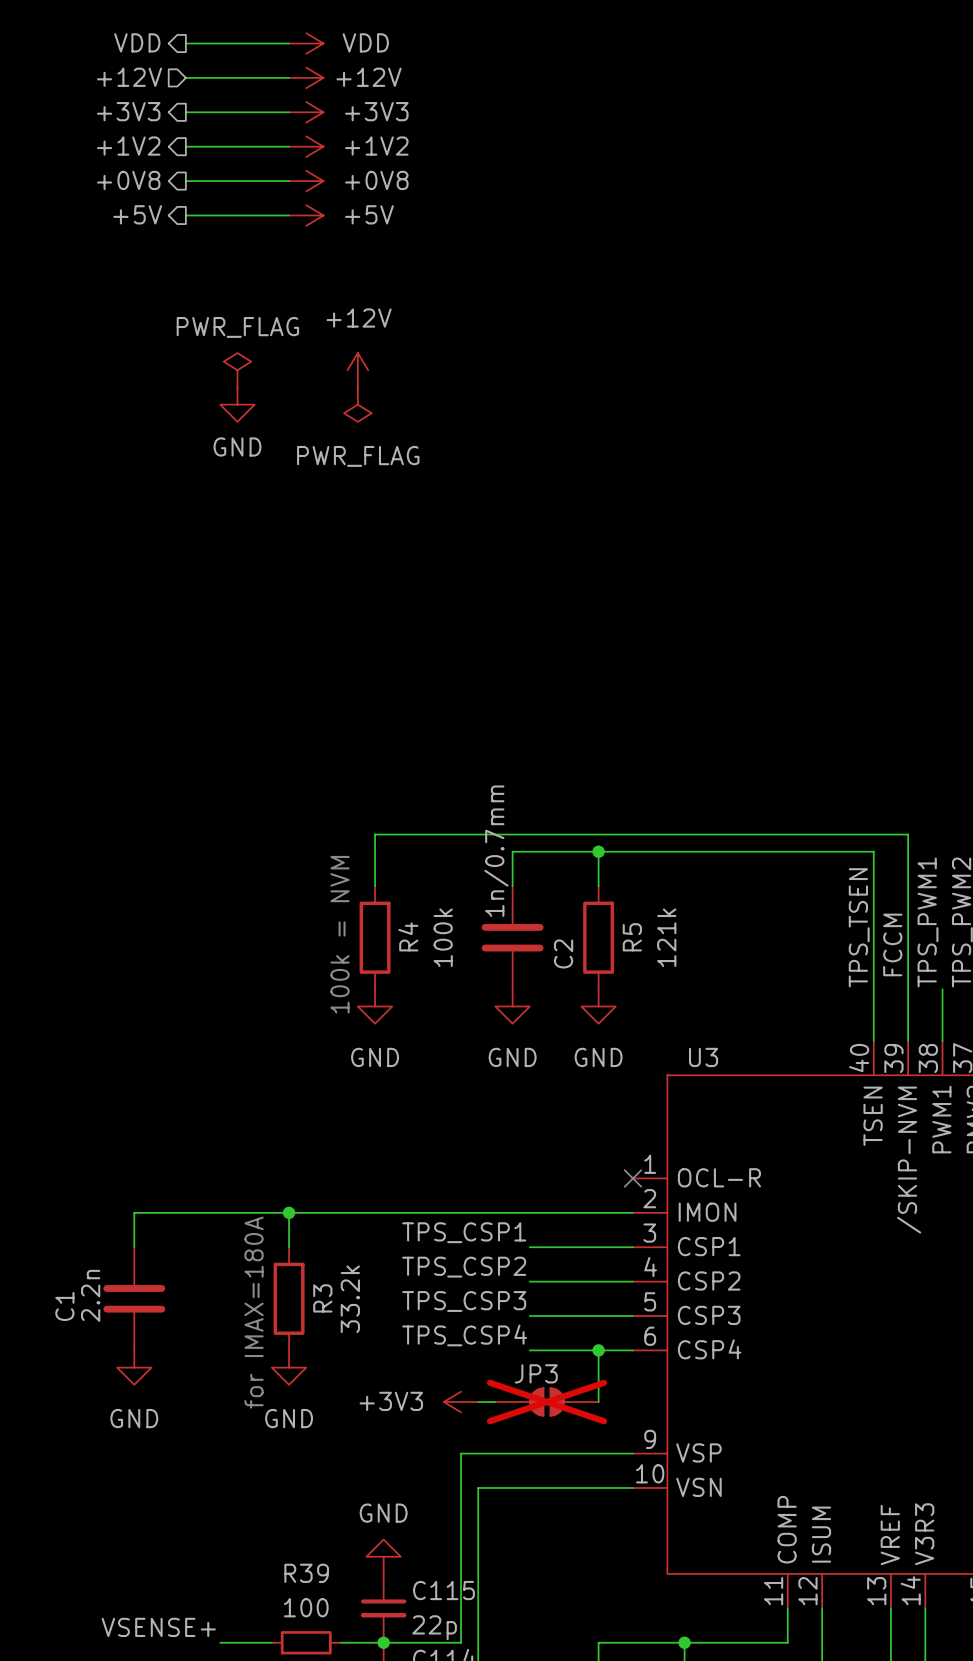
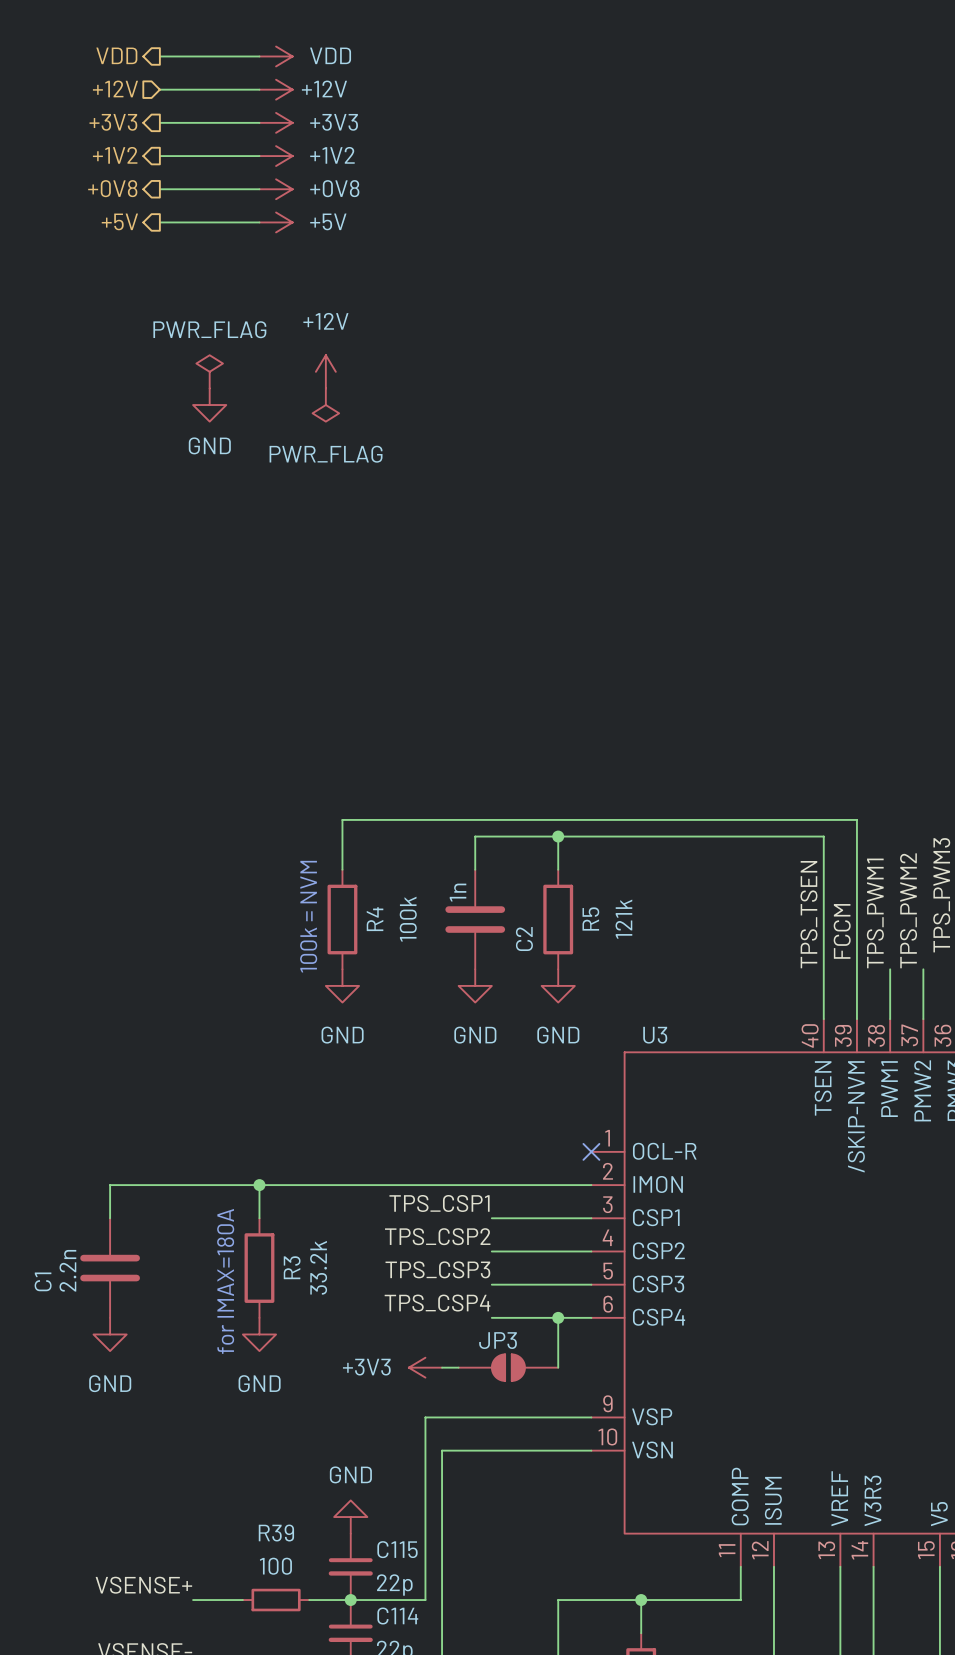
C2 value: 1n/0.7mm (496, 851) -> 1n (458, 892)
JP3 do-not-place cross: (547, 1402) -> none

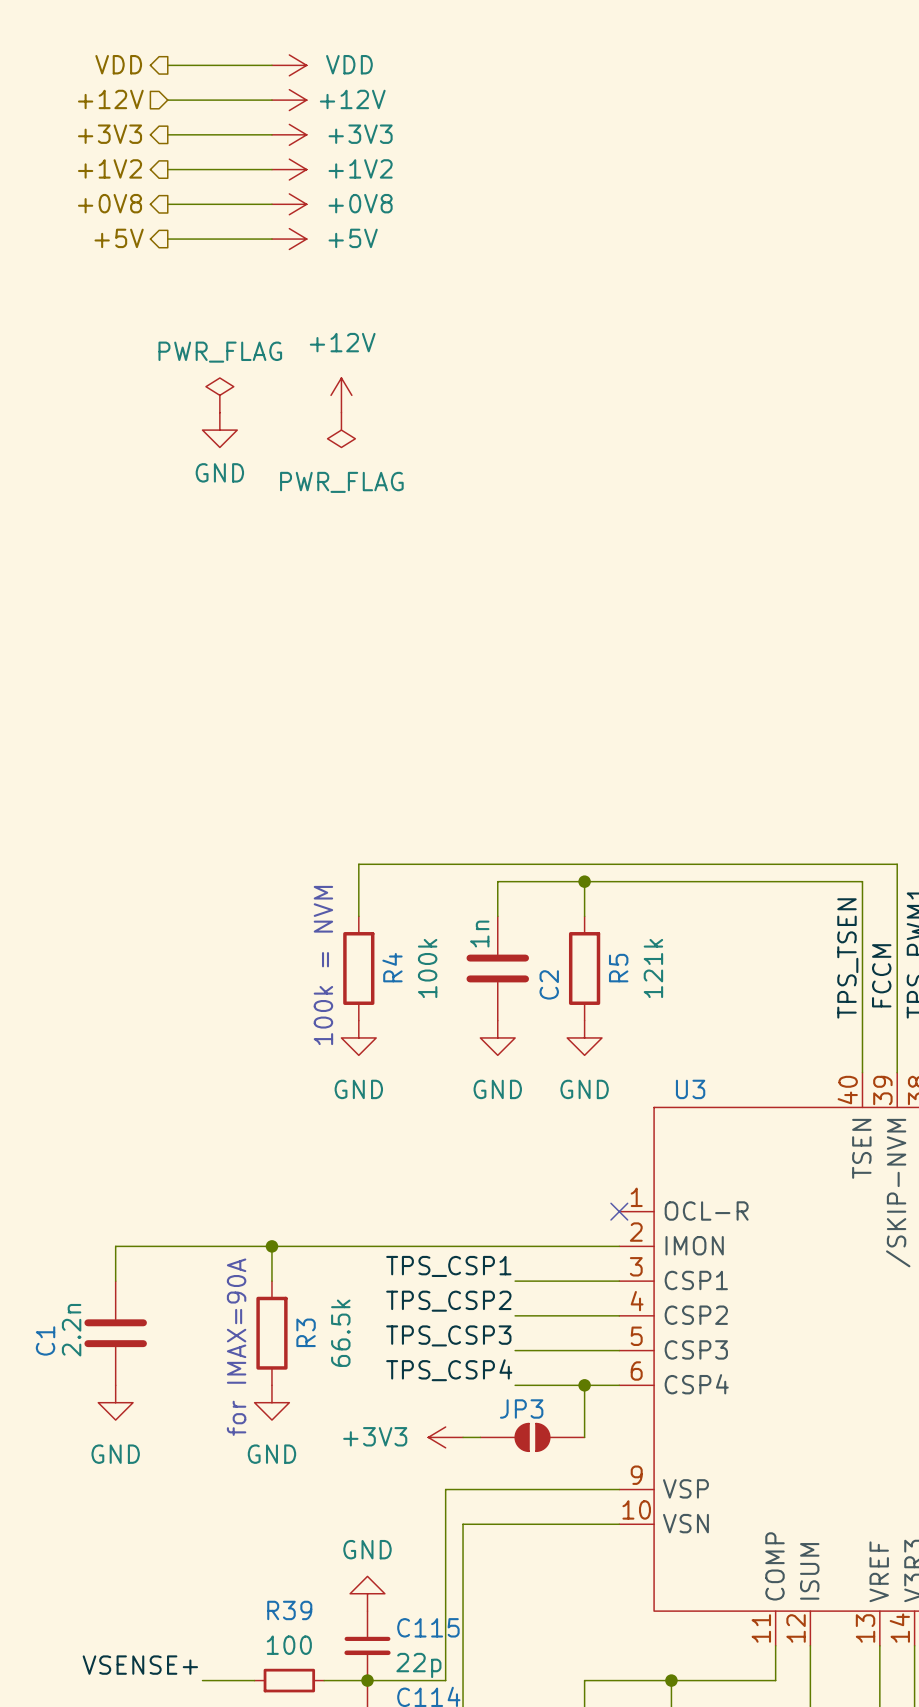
R3 value: 33.2k (318, 1267) -> 66.5k (340, 1333)
text: for IMAX=180A (225, 1281) -> for IMAX=90A (236, 1347)

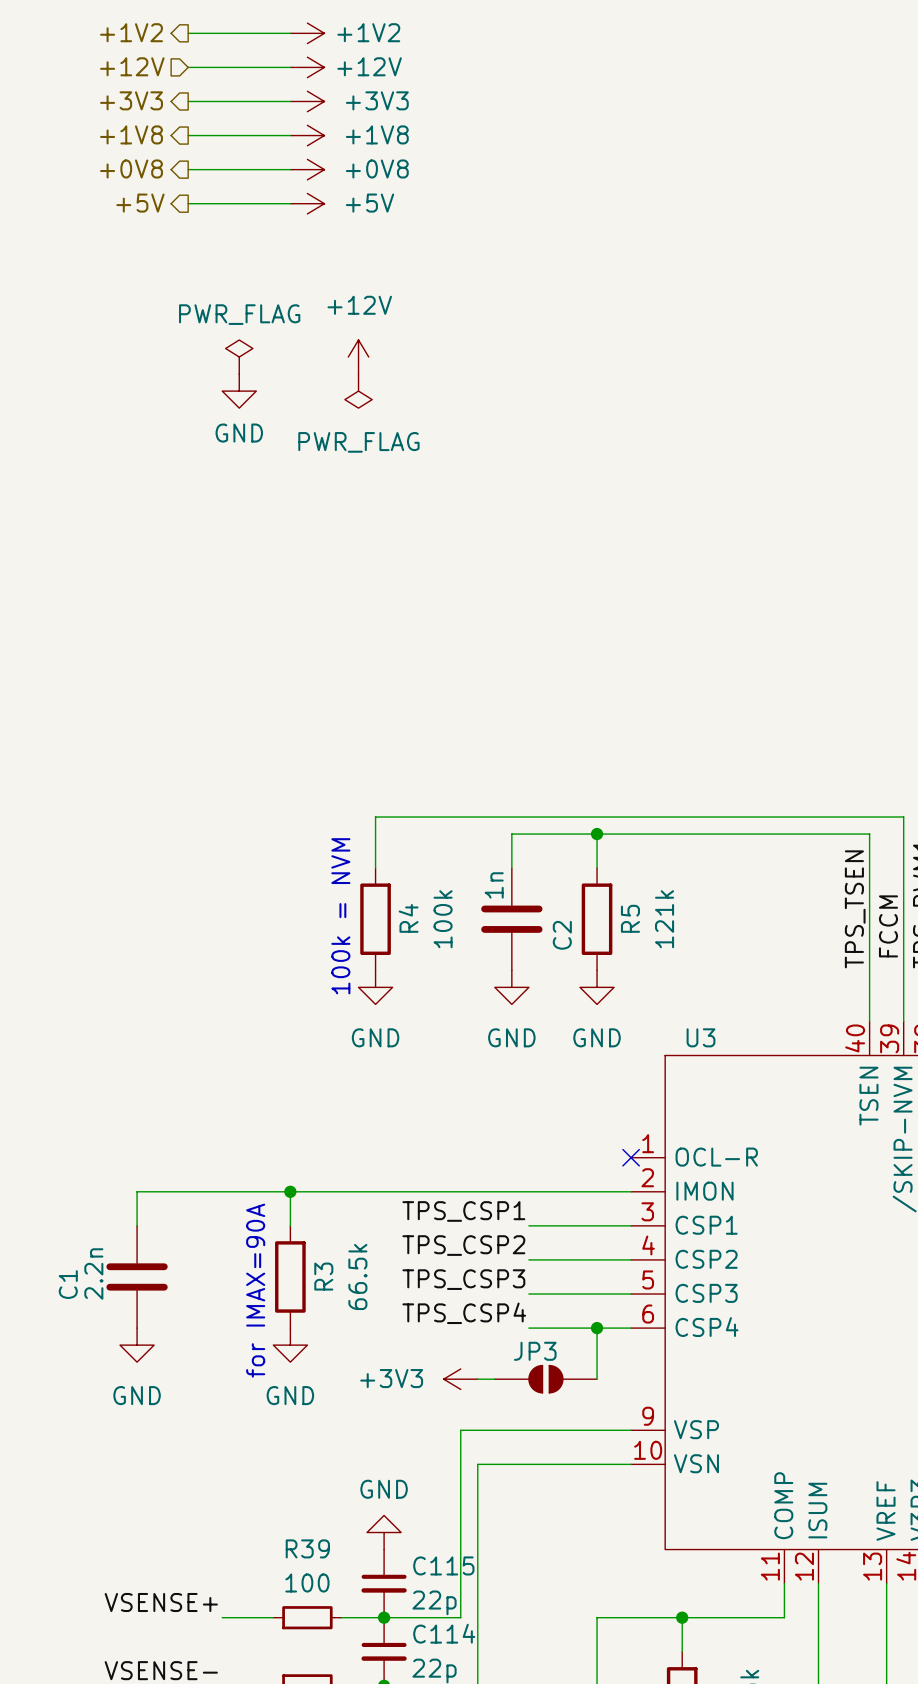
hierarchical label: VDD (118, 64) -> +1V2 (131, 32)
power symbol: VDD (289, 65) -> +1V2 (307, 33)
hierarchical label: +1V2 (110, 168) -> +1V8 (131, 134)
power symbol: +1V2 (289, 169) -> +1V8 (307, 135)

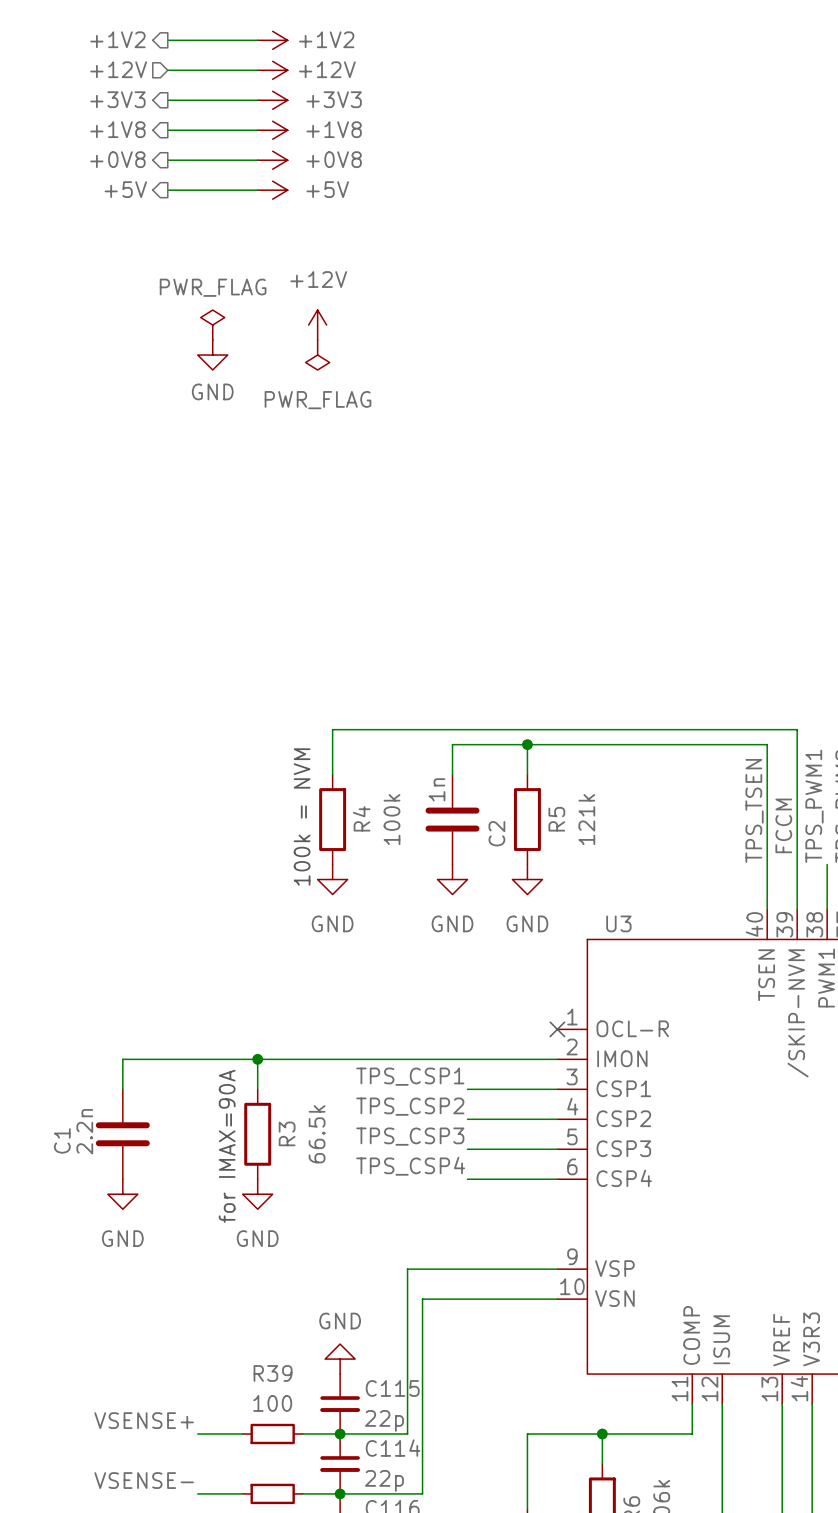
wire: (597, 1328) (597, 1379) -> none
junction: (597, 1328) -> none
power symbol: +3V3 (460, 1379) -> none
wire: (477, 1379) (494, 1379) -> none
JP3: (545, 1379) -> none

